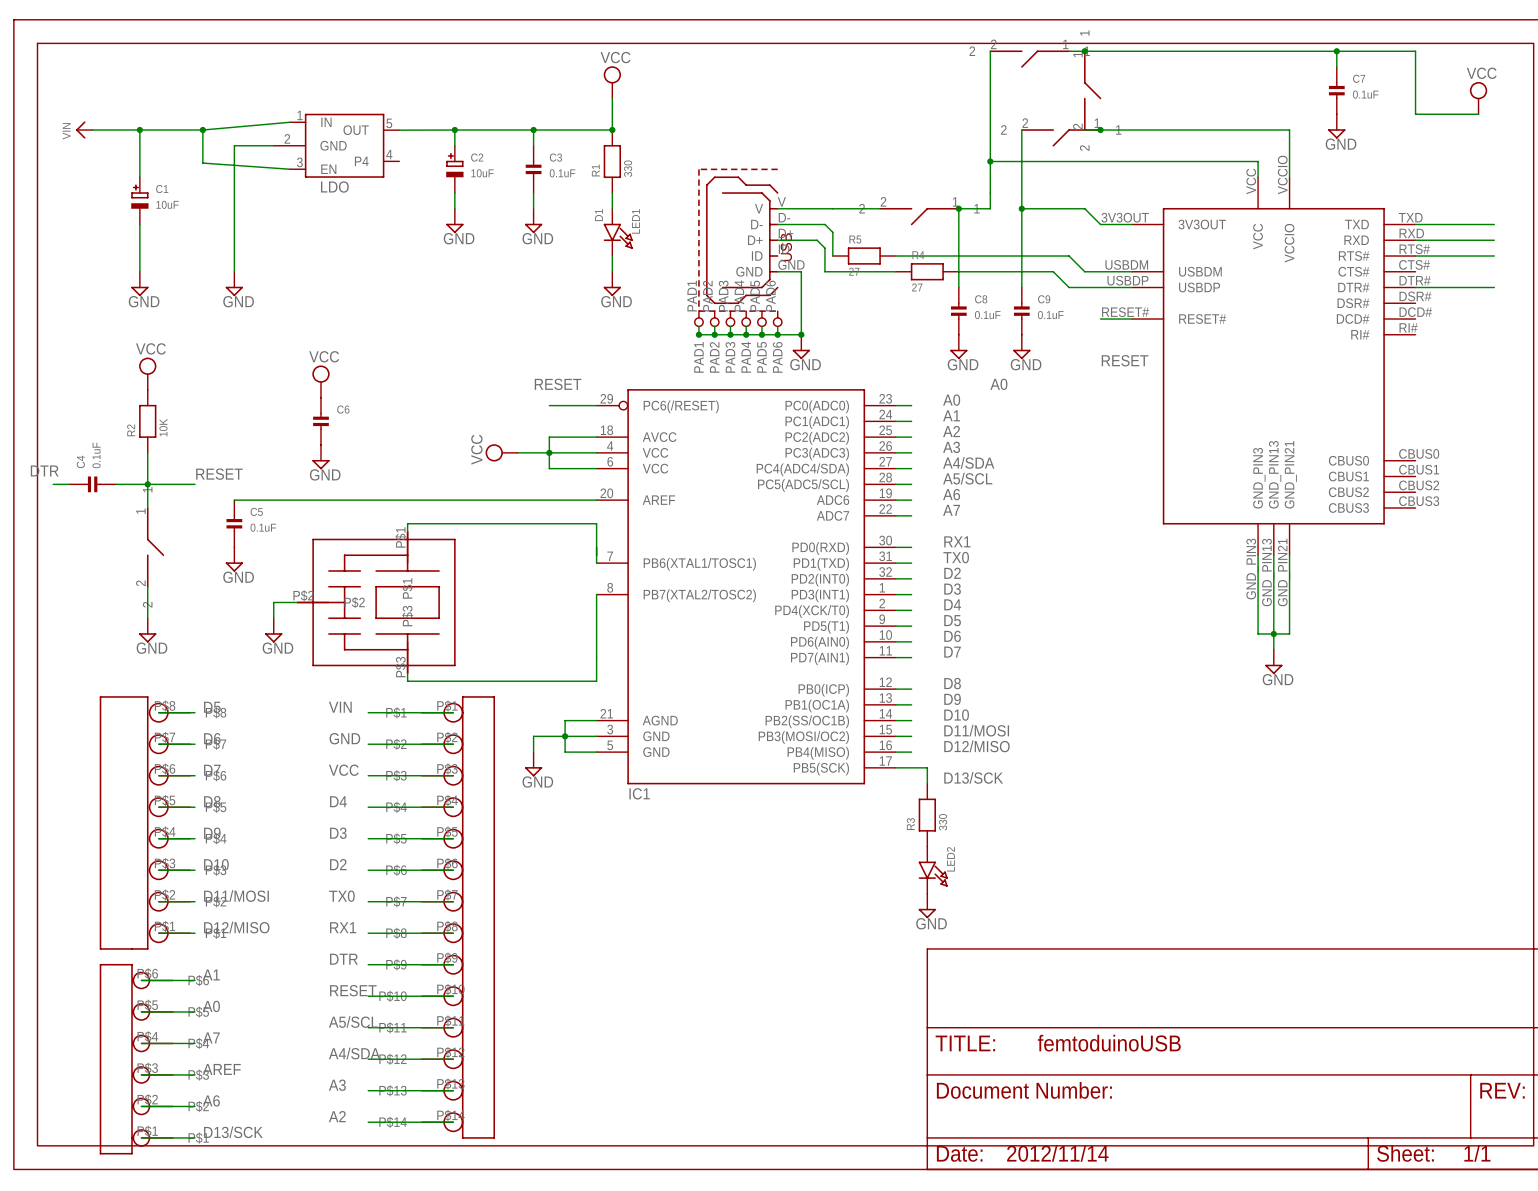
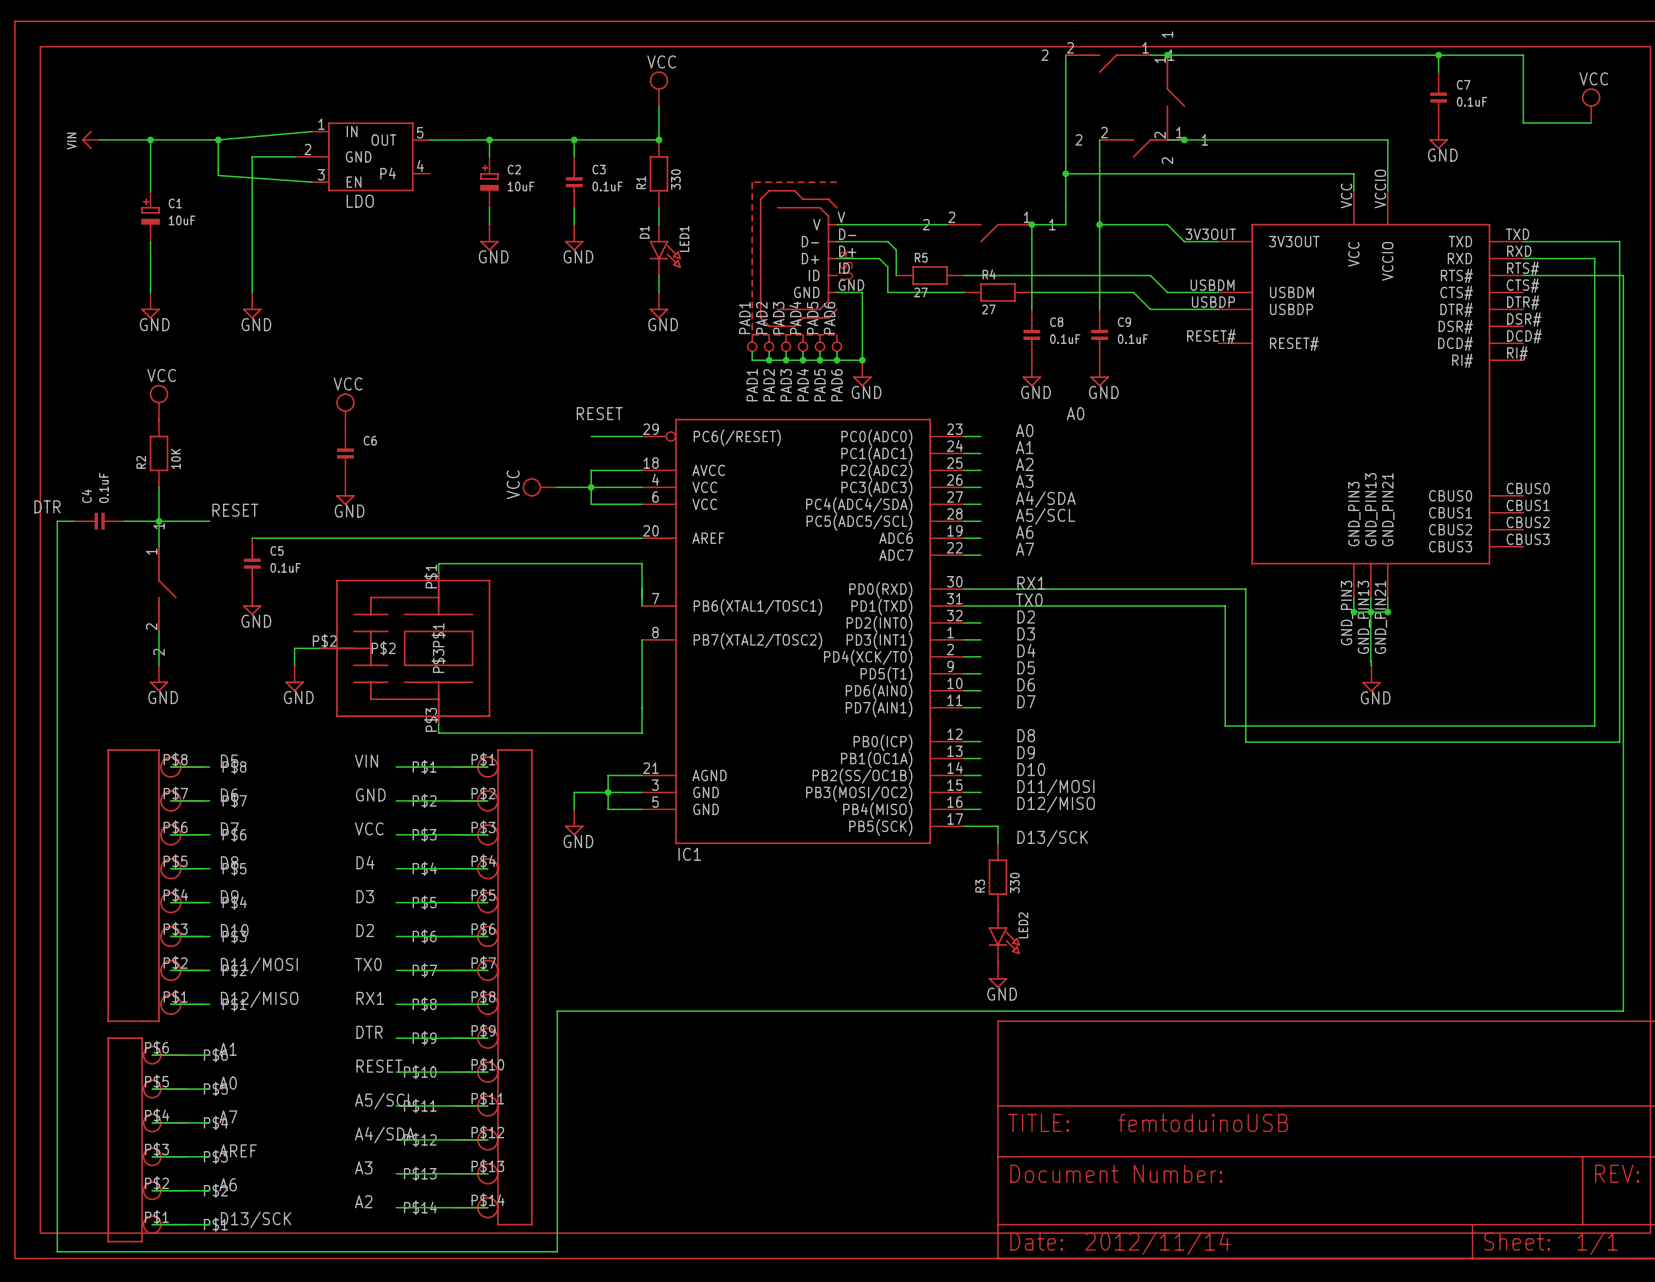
wire: none -> (1608, 241) (1619, 241) (1619, 742) (1245, 742) (1245, 589) (981, 589)
wire: (1481, 240) (1494, 240) -> (1594, 258) (1594, 726) (1225, 726) (1225, 606) (981, 606)
wire: none -> (1608, 275) (1623, 275) (1623, 1011) (557, 1011) (557, 1251) (57, 1251) (57, 521)
wire: (1415, 287) (1494, 287) -> none
wire: (1100, 319) (1132, 319) -> none
junction: (698, 334) -> none
label: RESET (1125, 360) -> none
wire: (1258, 568) (1258, 633) (1289, 633) (1289, 568) -> (1353, 612) (1387, 612)
junction: none -> (1353, 612)
junction: none -> (1370, 612)
junction: none -> (1387, 612)
wire: (1273, 614) (1273, 649) -> (1370, 661) (1371, 665)
junction: (1273, 633) -> none
power symbol position: GND (1273, 661) -> GND (1371, 678)

